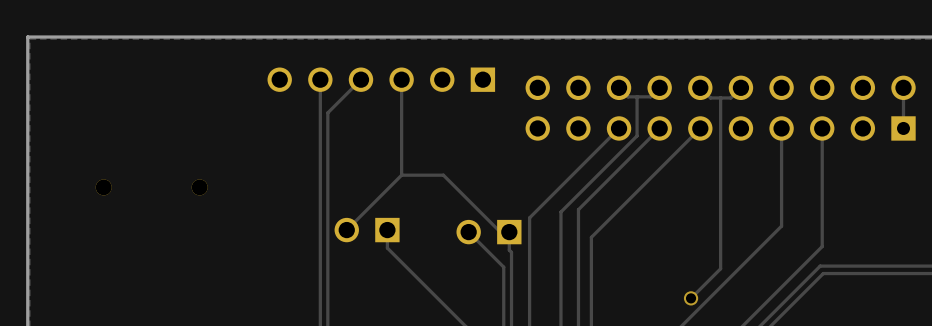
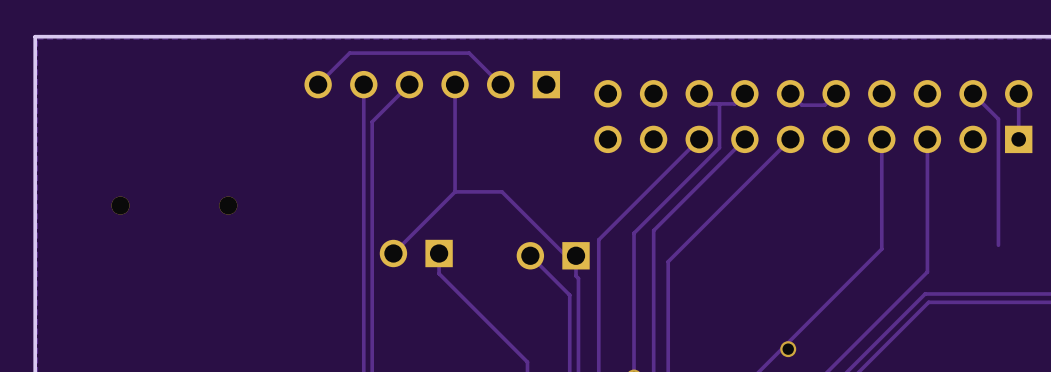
track: none -> (500, 84) (469, 53) (349, 53) (318, 84)
track: none -> (973, 93) (998, 119) (998, 245)
track: (720, 97) (720, 268) (691, 298) -> none
via position: (691, 298) -> (788, 349)

